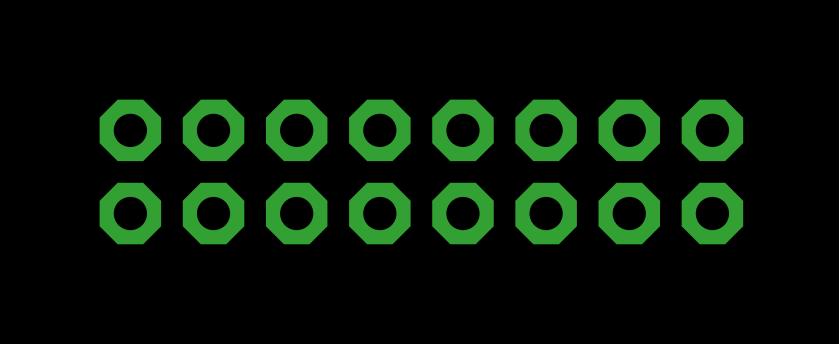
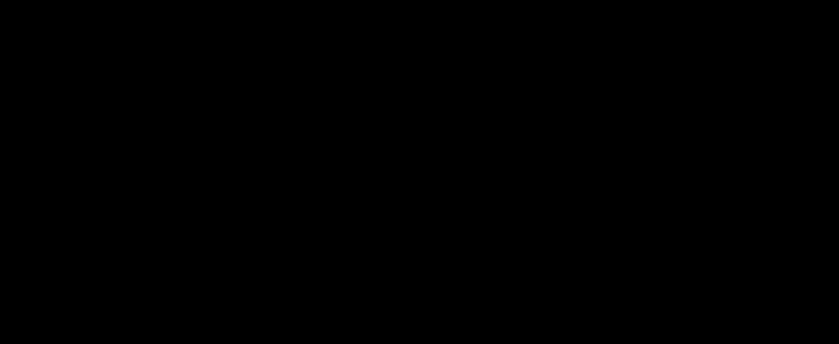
part: (421, 171) -> none

